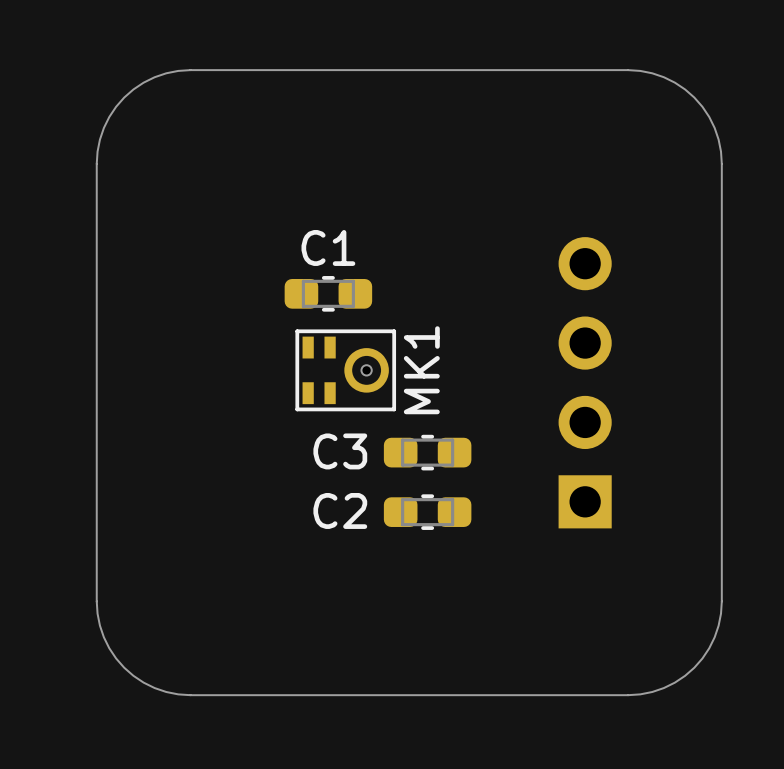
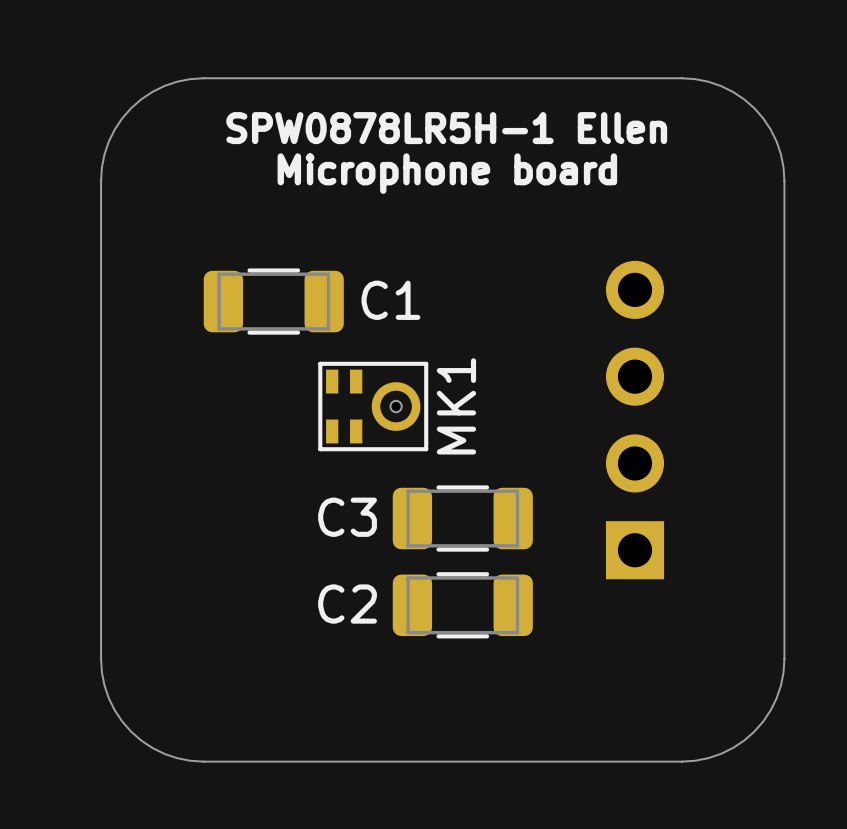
text: none -> SPW0878LR5H-1 Ellen (446, 128)
text: none -> Microphone board (447, 173)
C1 name position: C1 (328, 247) -> C1 (390, 300)
C1 footprint: [284, 276, 373, 312] -> [203, 268, 344, 335]
C3 footprint: [383, 434, 472, 471] -> [392, 485, 533, 552]
C2 footprint: [383, 494, 472, 530] -> [392, 572, 533, 639]

